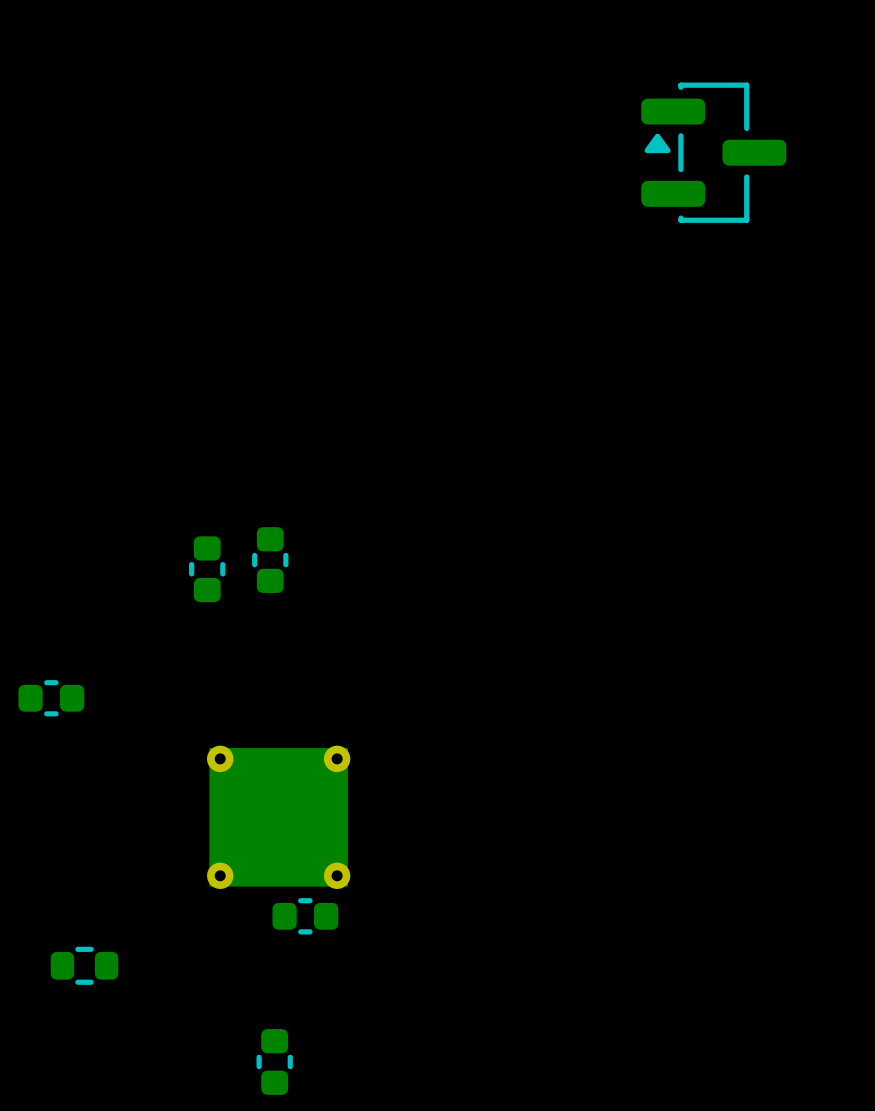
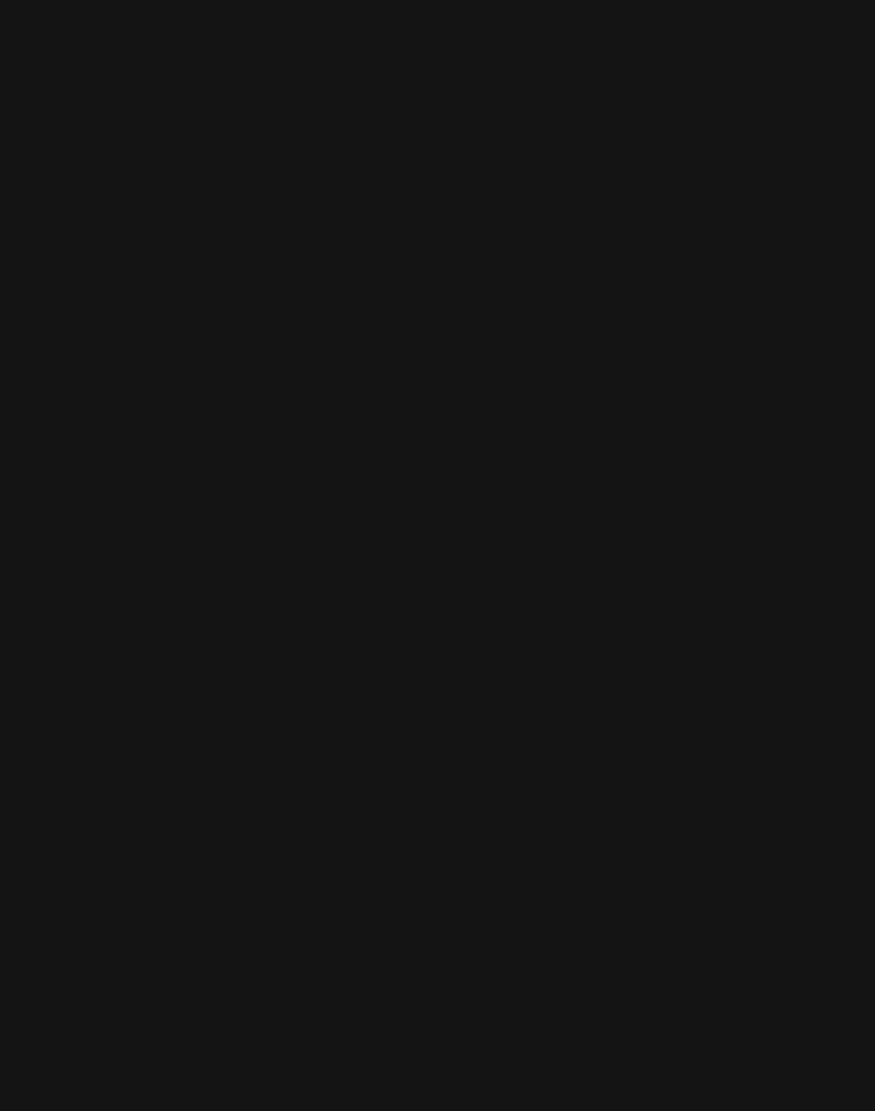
part: (713, 152) -> none
part: (270, 560) -> none
part: (207, 569) -> none
part: (51, 698) -> none
part: (278, 817) -> none
part: (305, 916) -> none
part: (84, 965) -> none
part: (274, 1061) -> none

